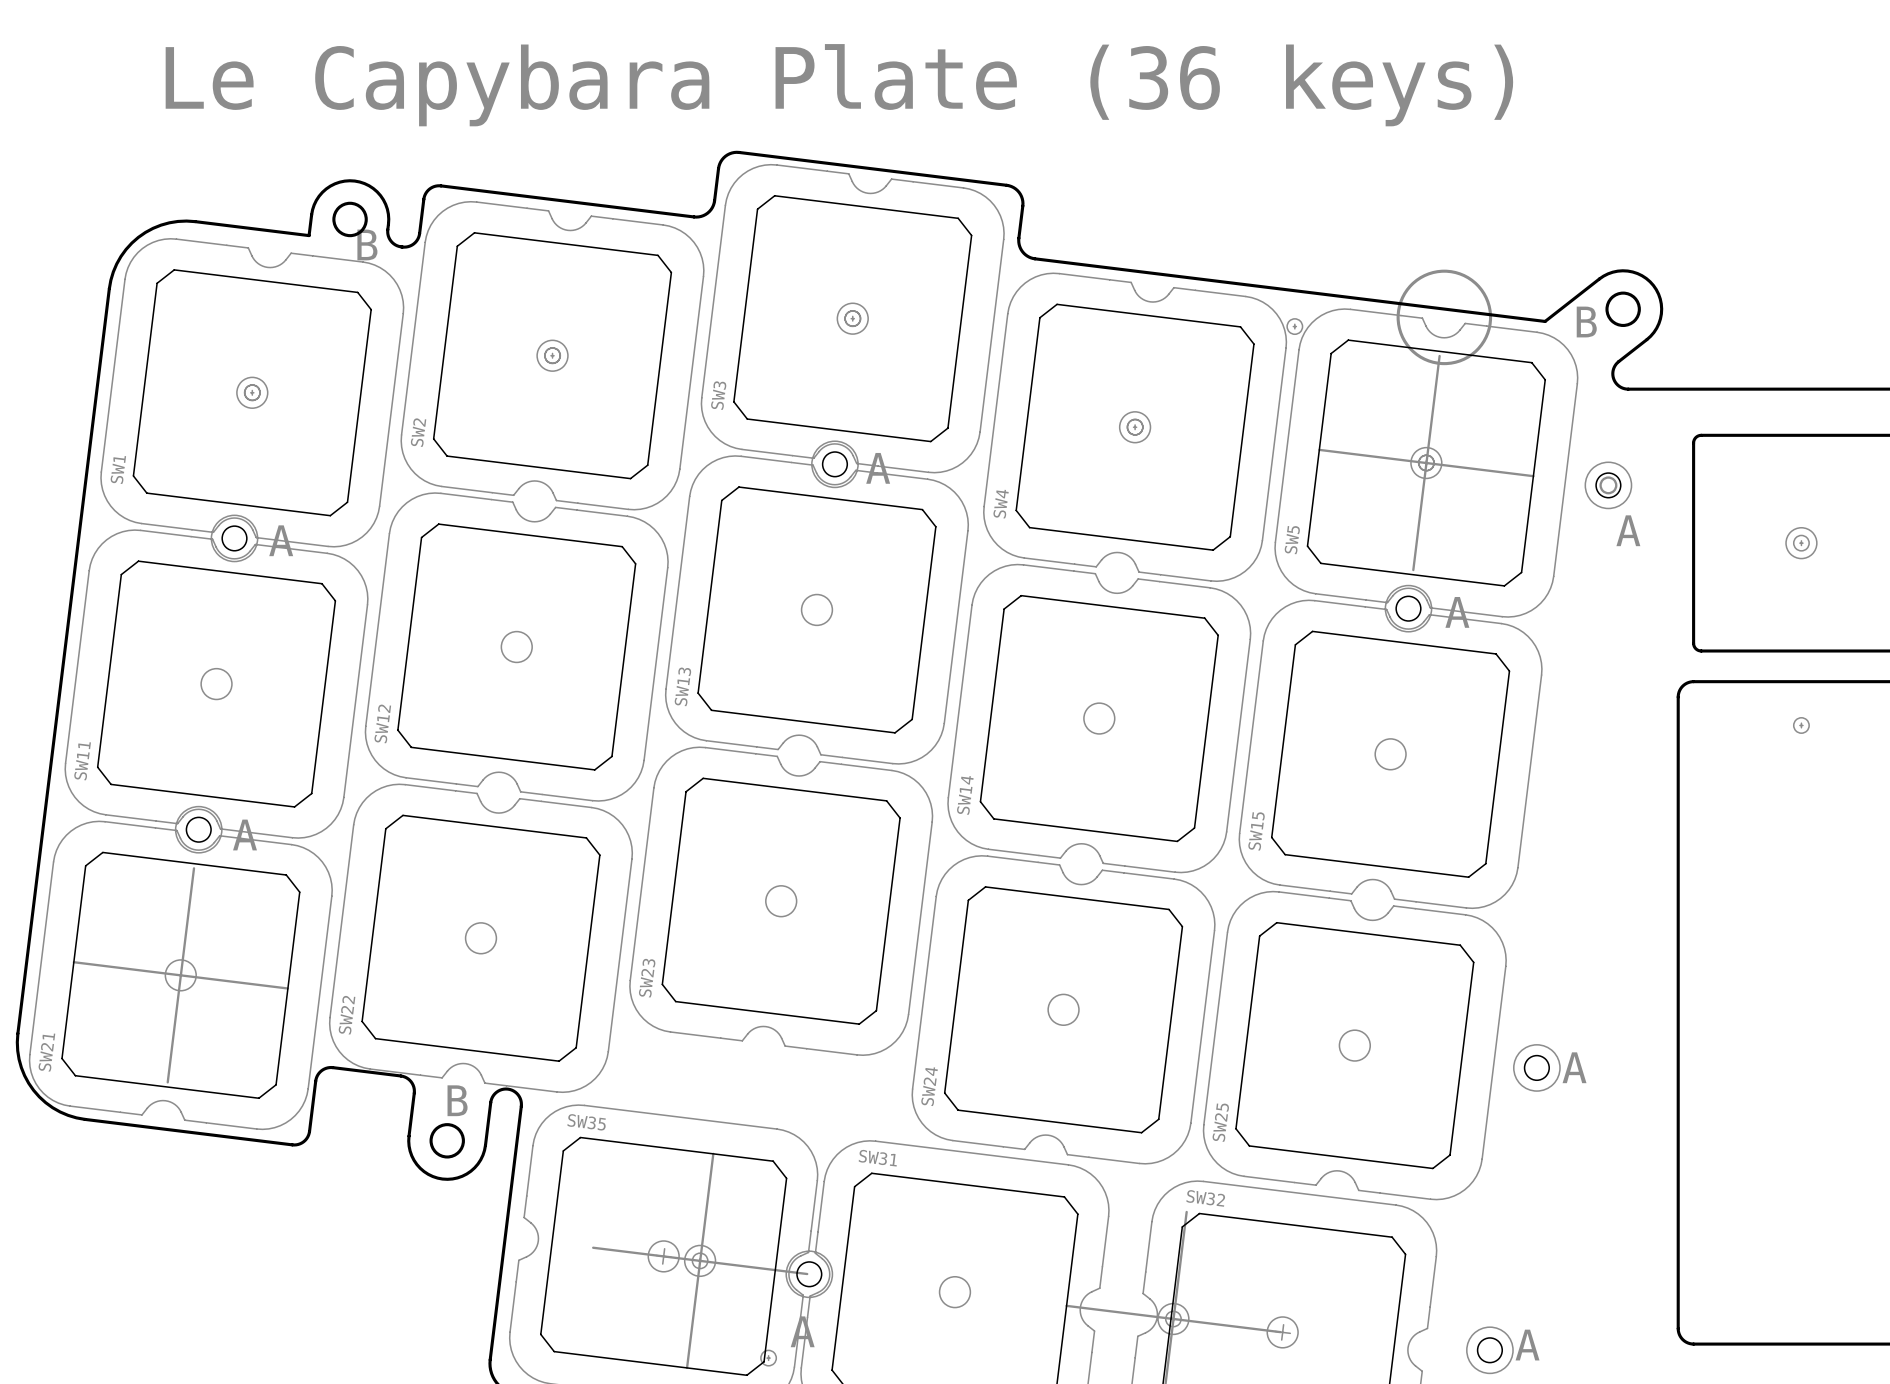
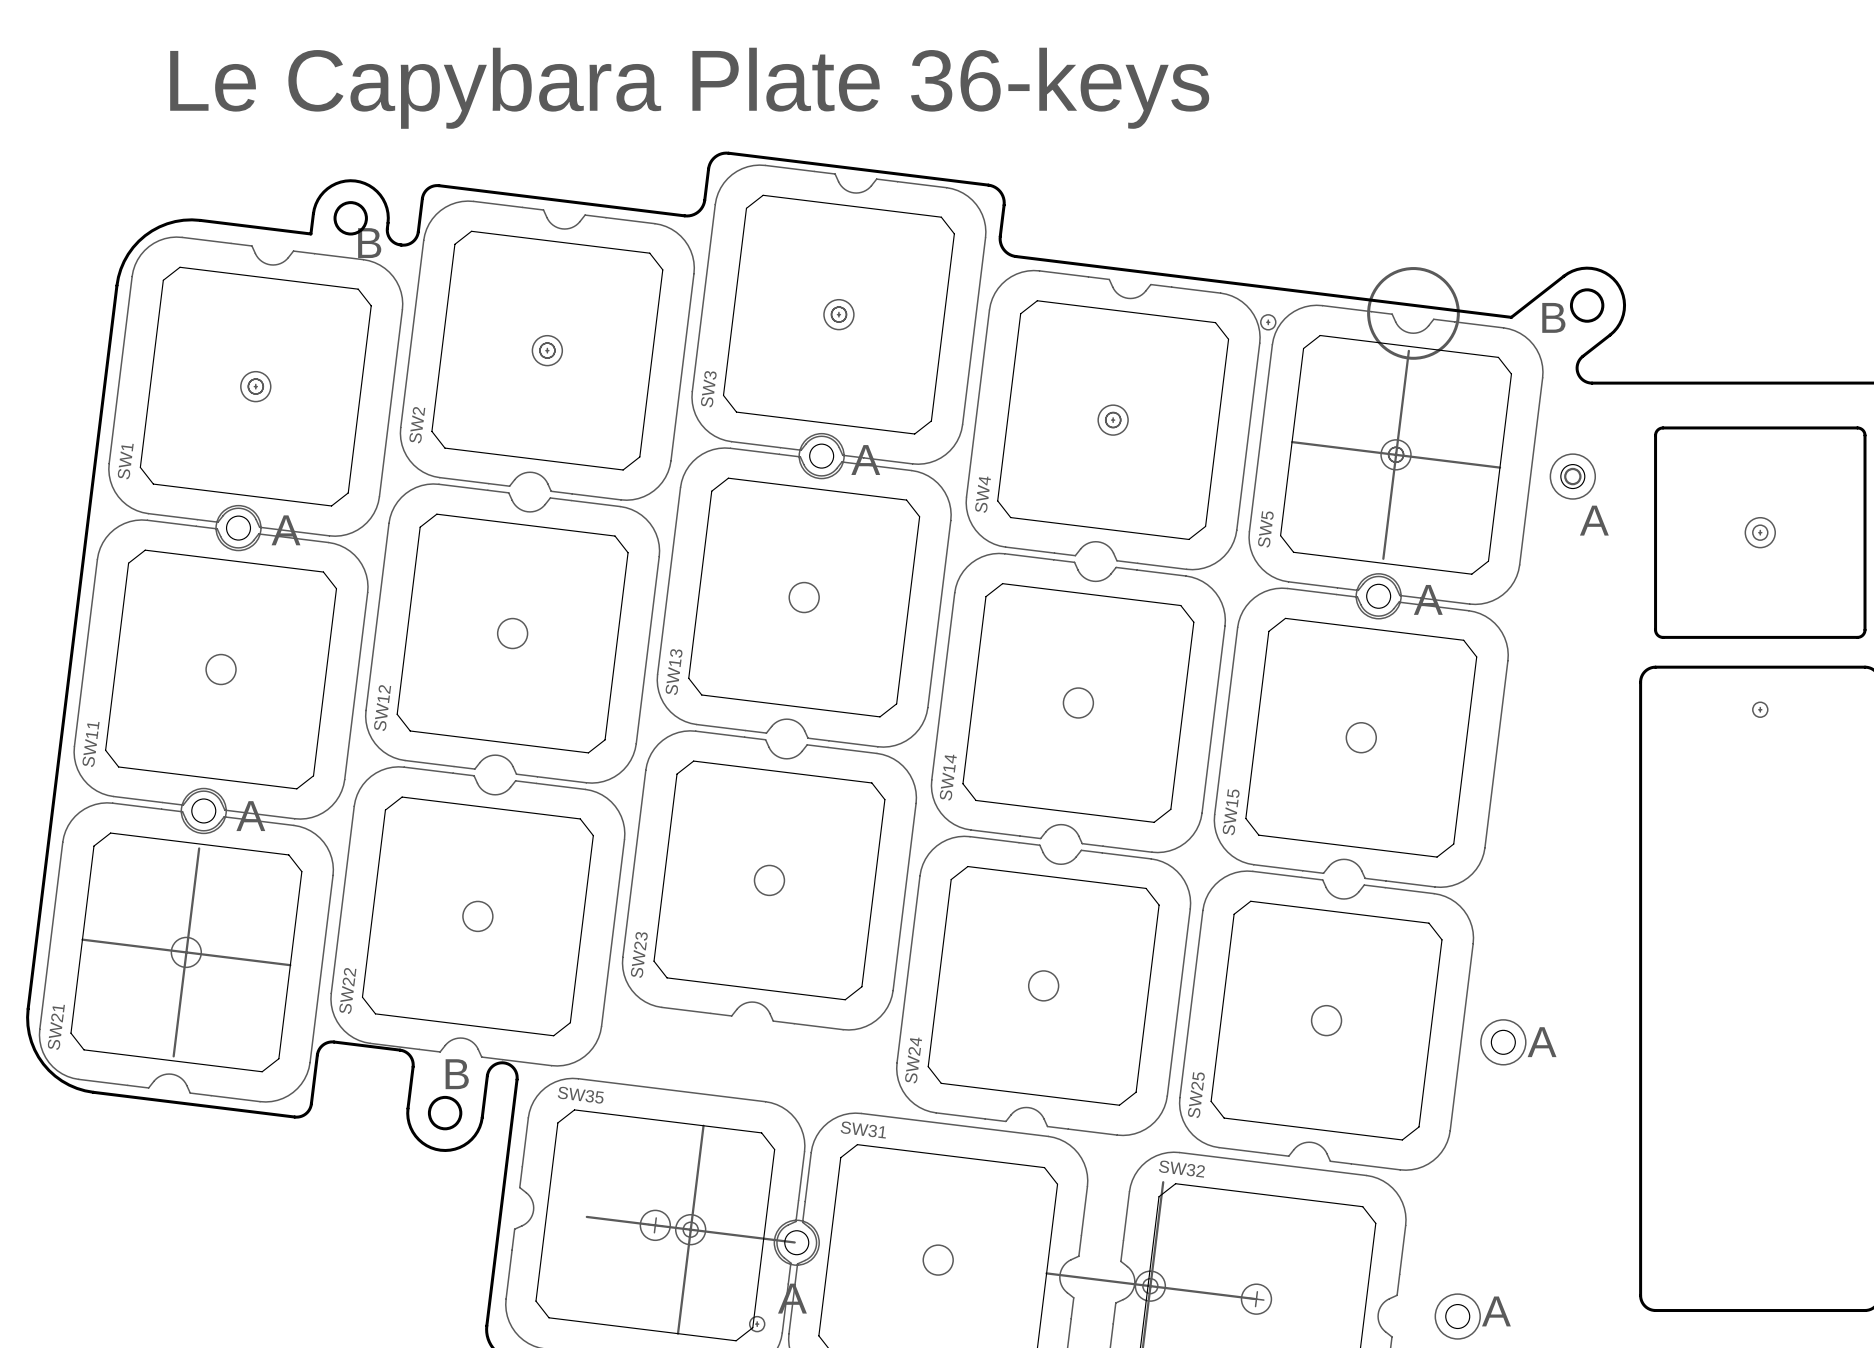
text: Le Capybara Plate (36 keys) (839, 85) -> Le Capybara Plate 36-keys (689, 88)

